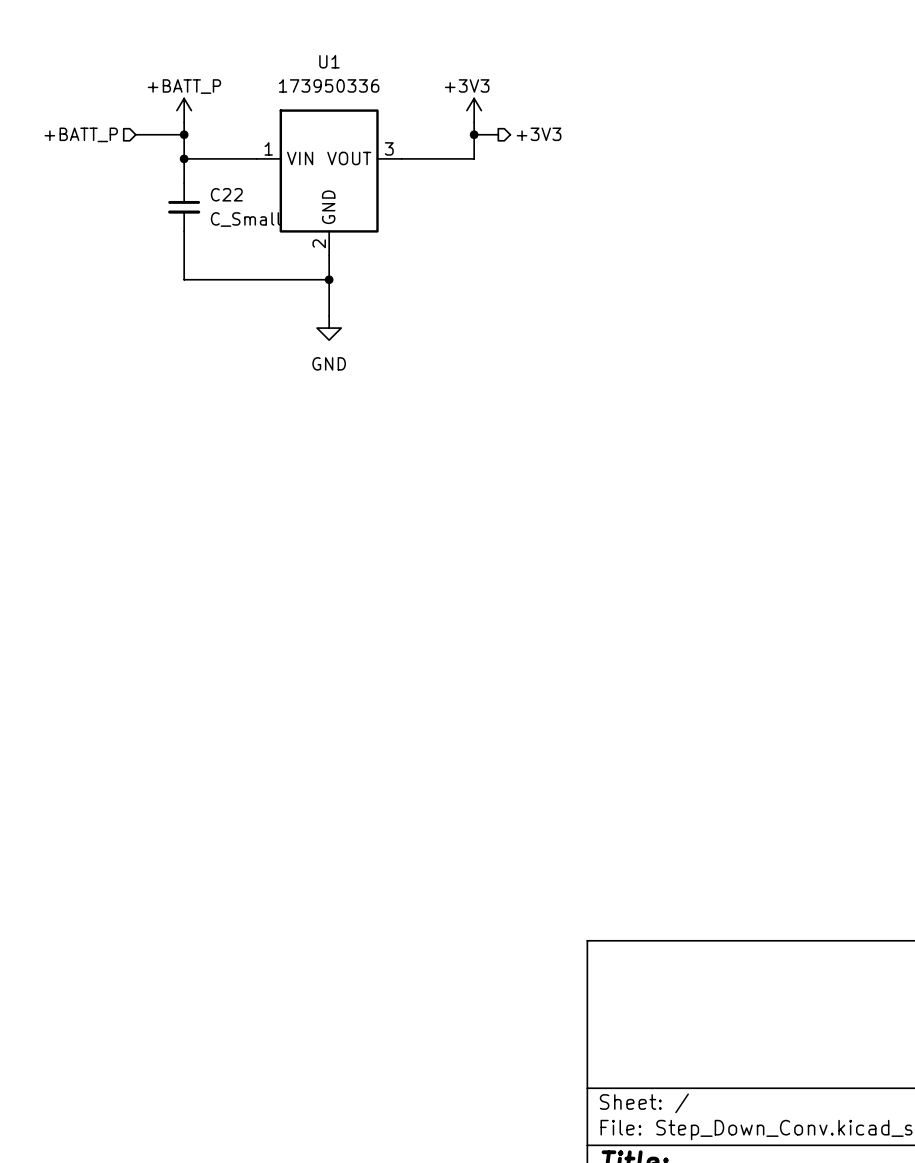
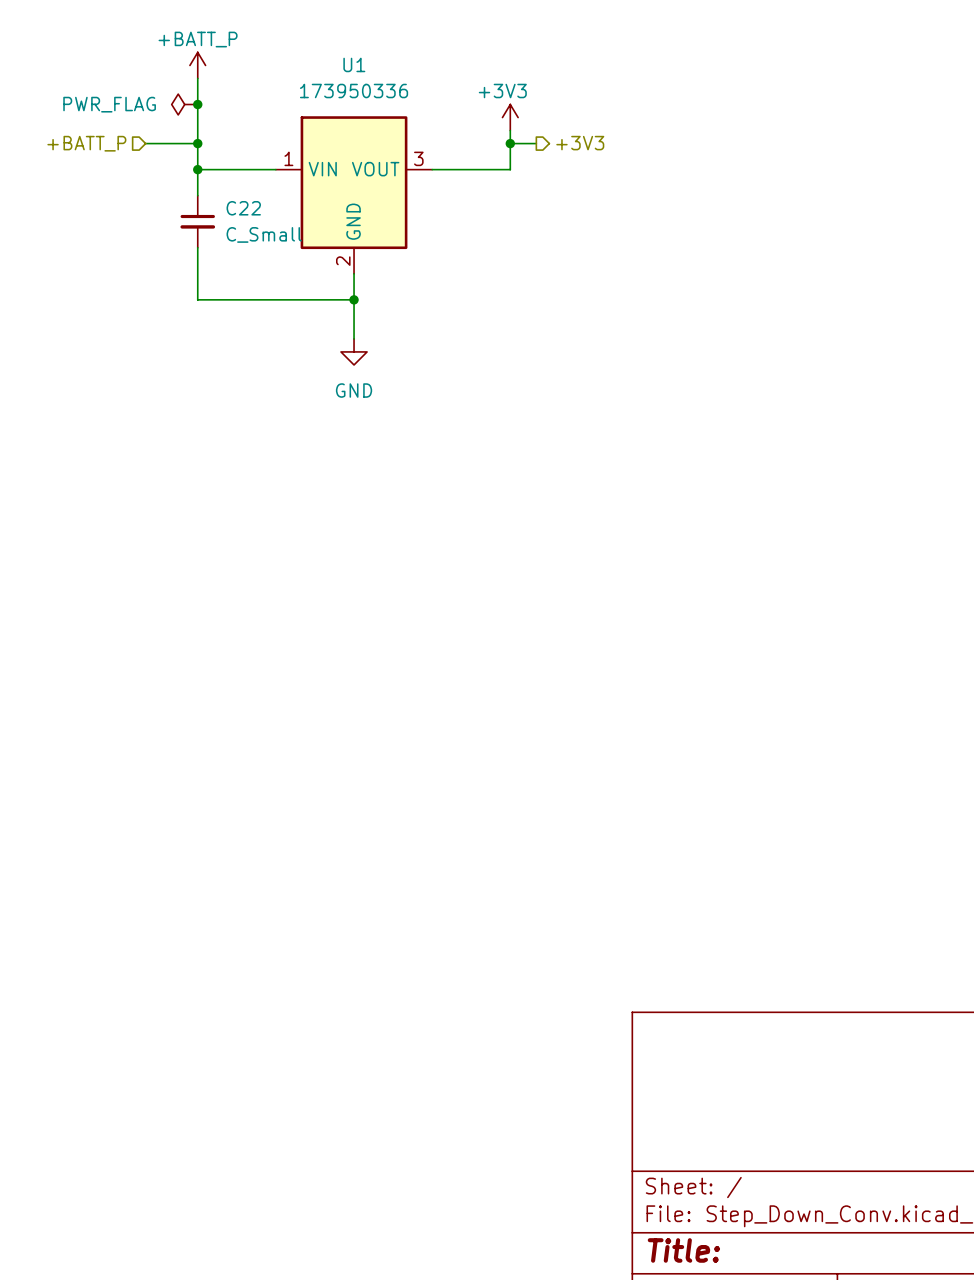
power symbol: none -> PWR_FLAG (184, 104)
junction: none -> (197, 104)
power symbol position: +BATT_P (184, 110) -> +BATT_P (197, 65)

